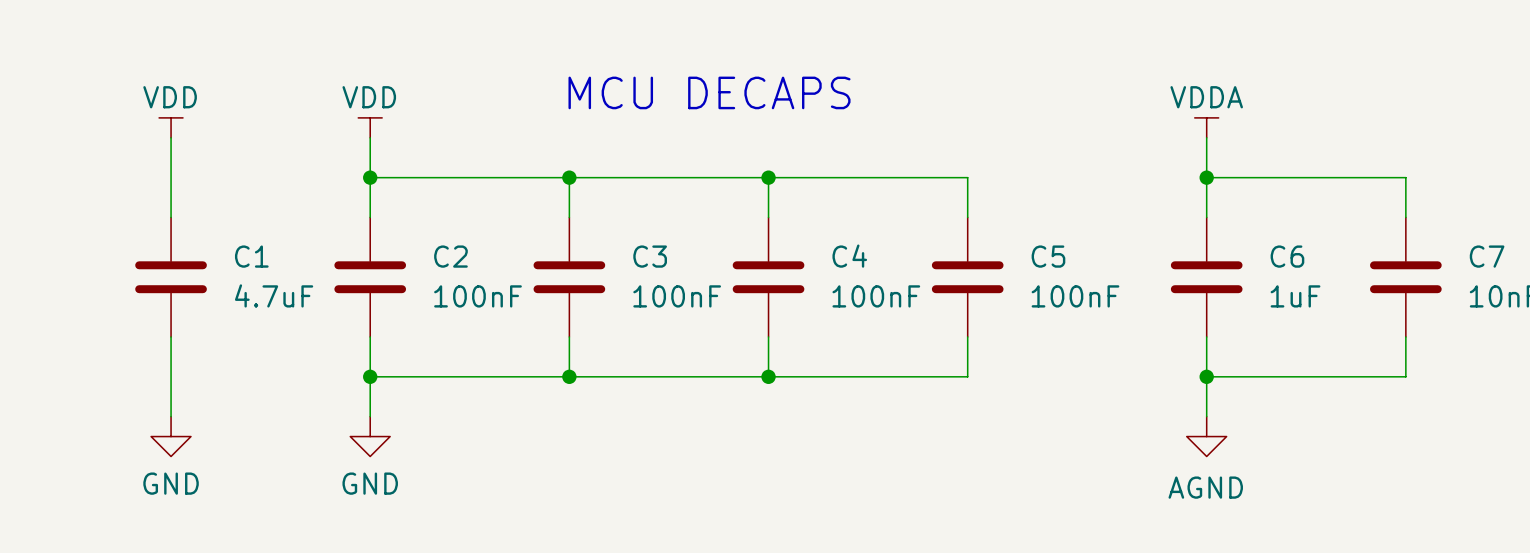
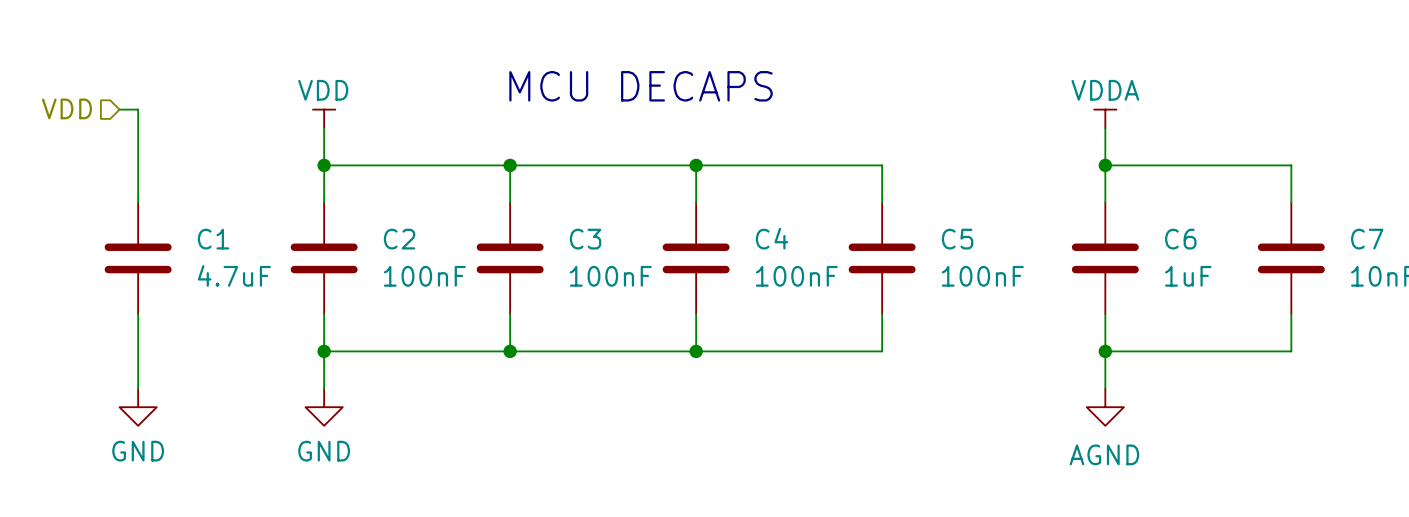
hierarchical label: none -> VDD (66, 108)
power symbol: VDD (171, 127) -> none

